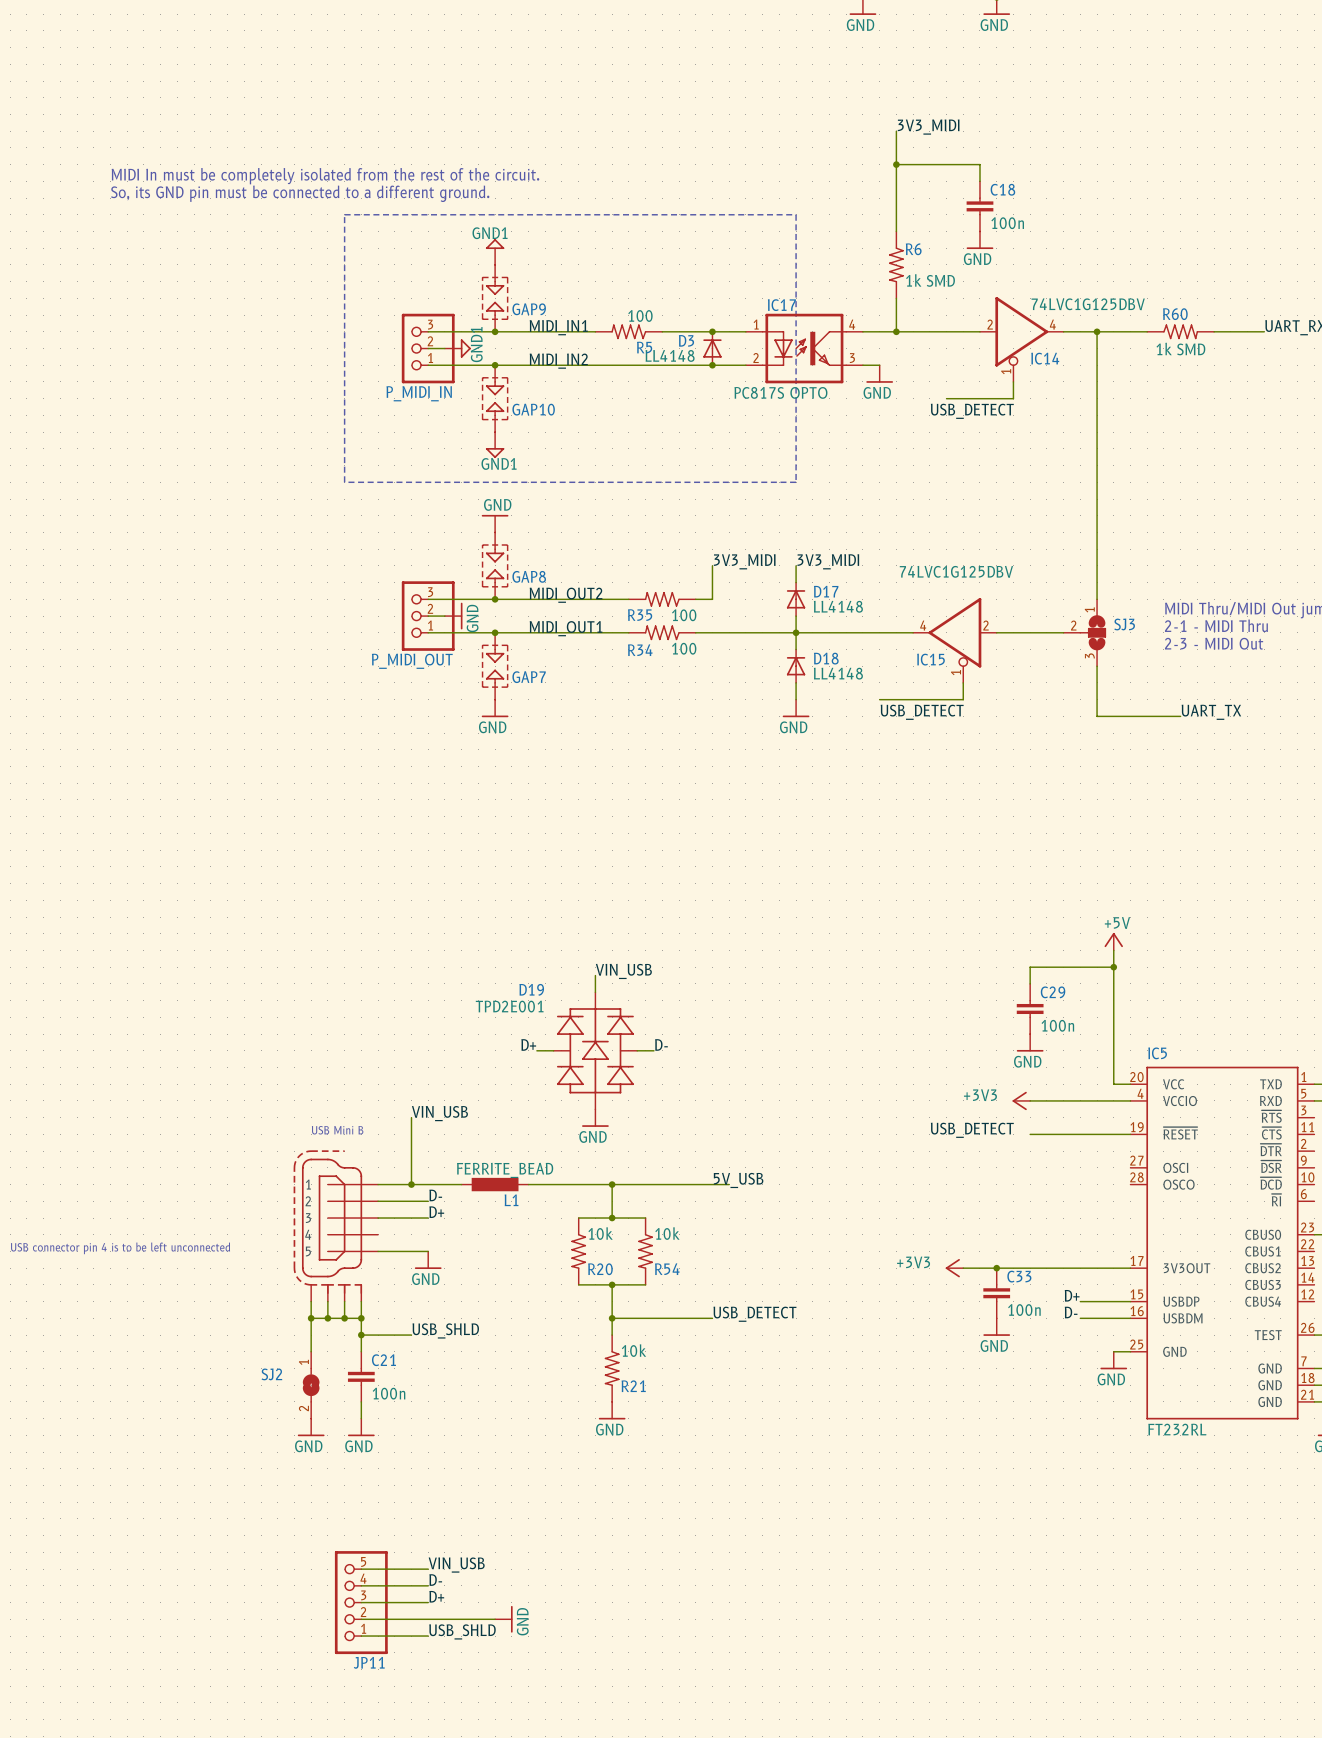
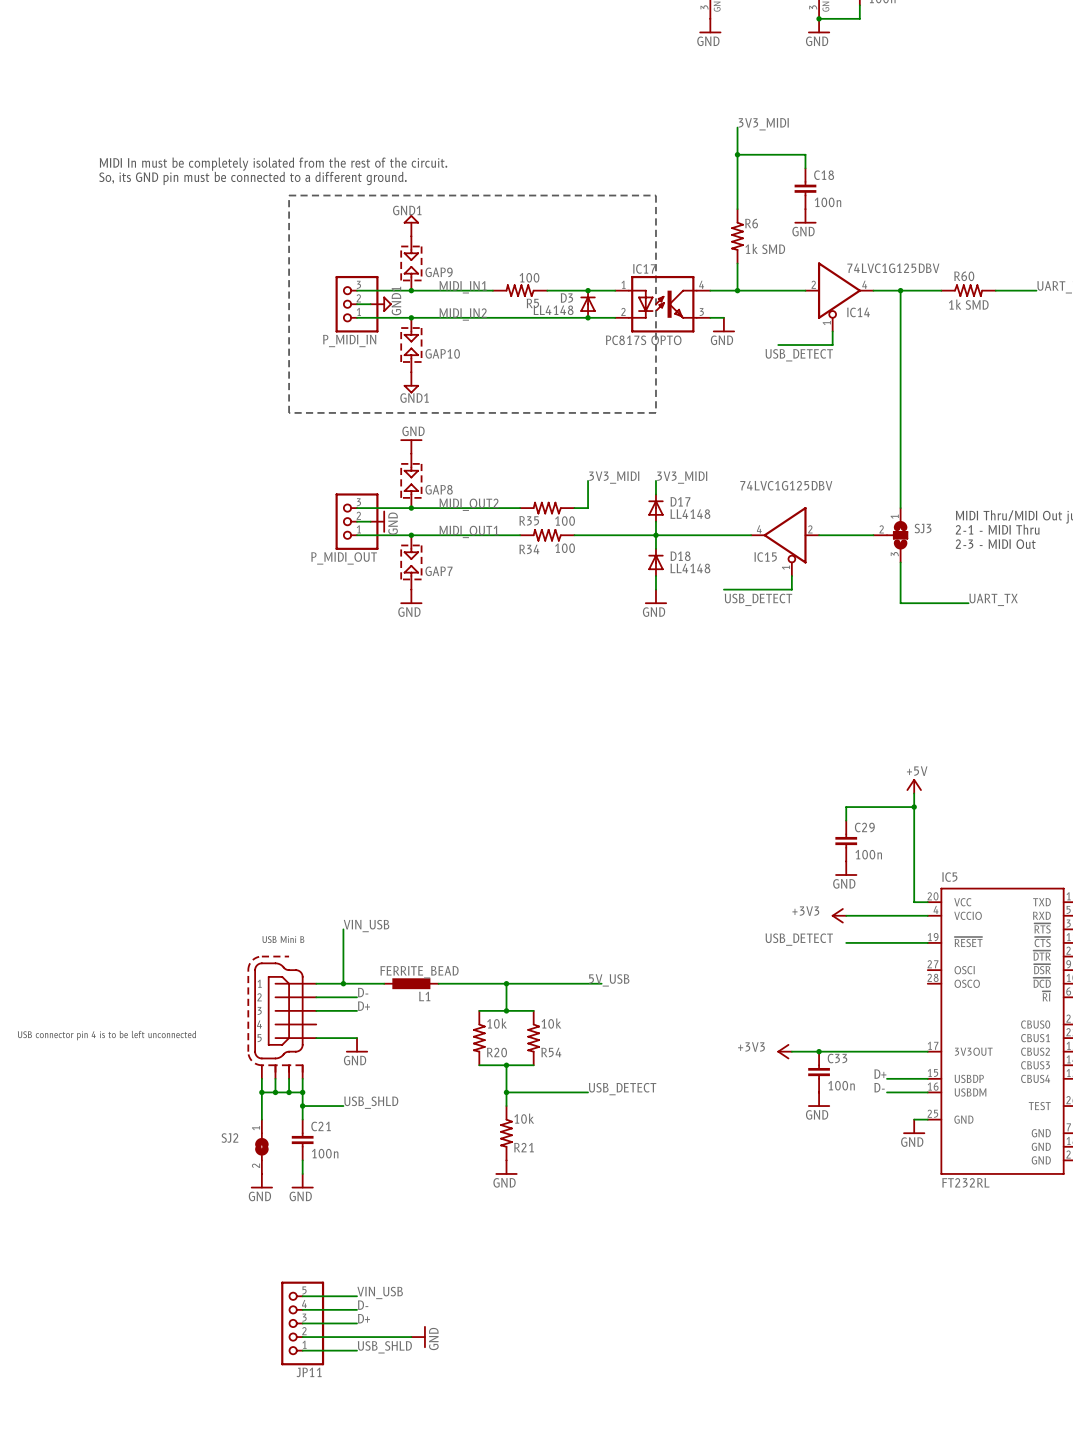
label: VIN_USB (623, 971) -> none
wire: (595, 975) (595, 992) -> none
label: D+ (528, 1044) -> none
label: D- (661, 1044) -> none
wire: (536, 1050) (553, 1050) -> none
D19: (595, 1050) -> none
wire: (637, 1050) (653, 1050) -> none
power symbol: GND (595, 1118) -> none

